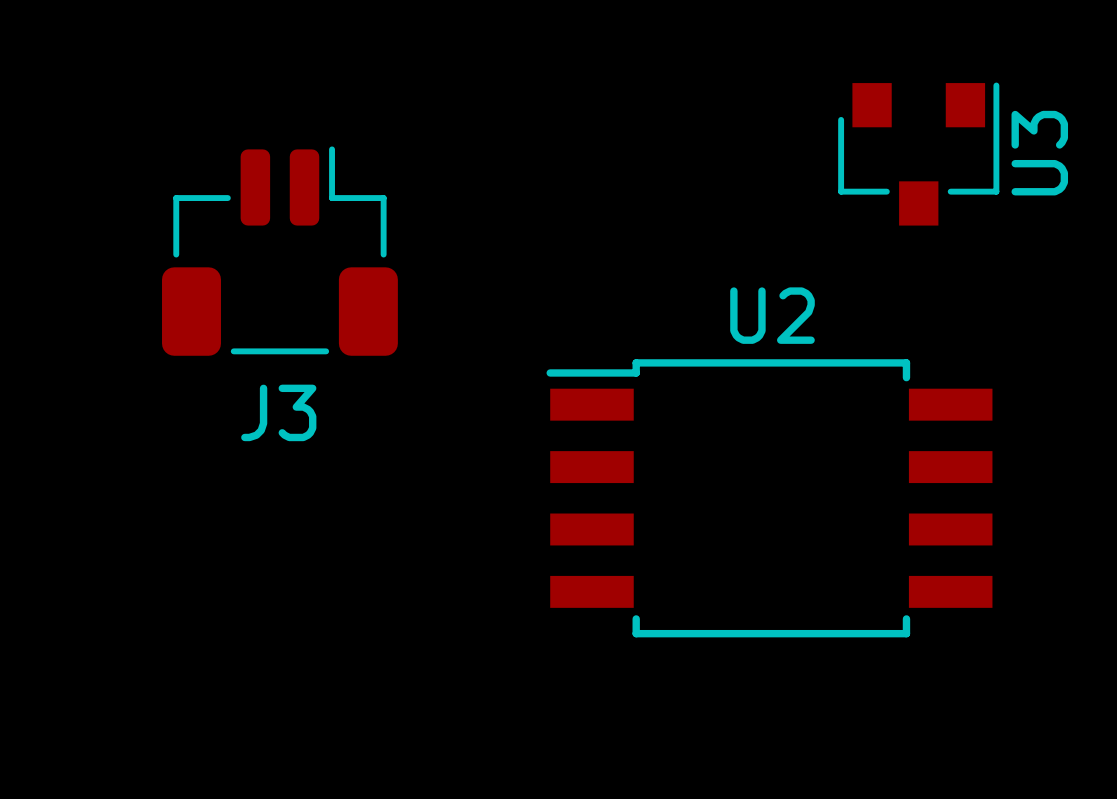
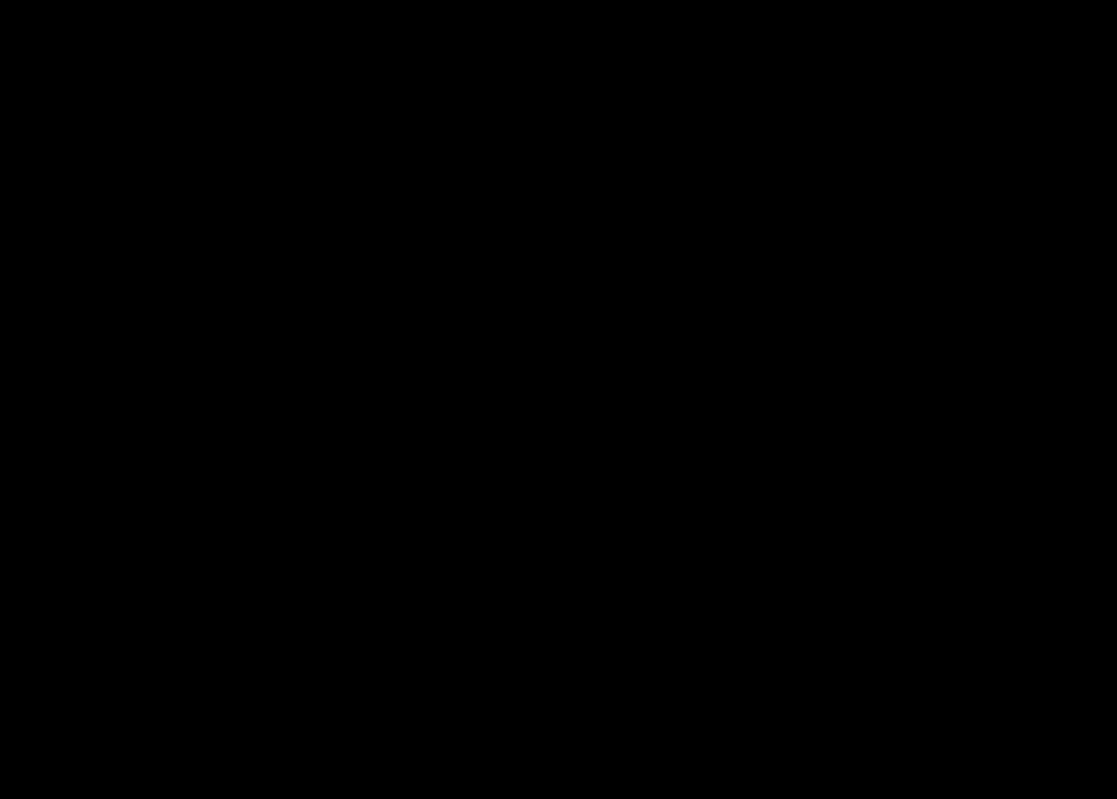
U3: (918, 154) -> none
J3: (279, 251) -> none
U2: (769, 498) -> none

